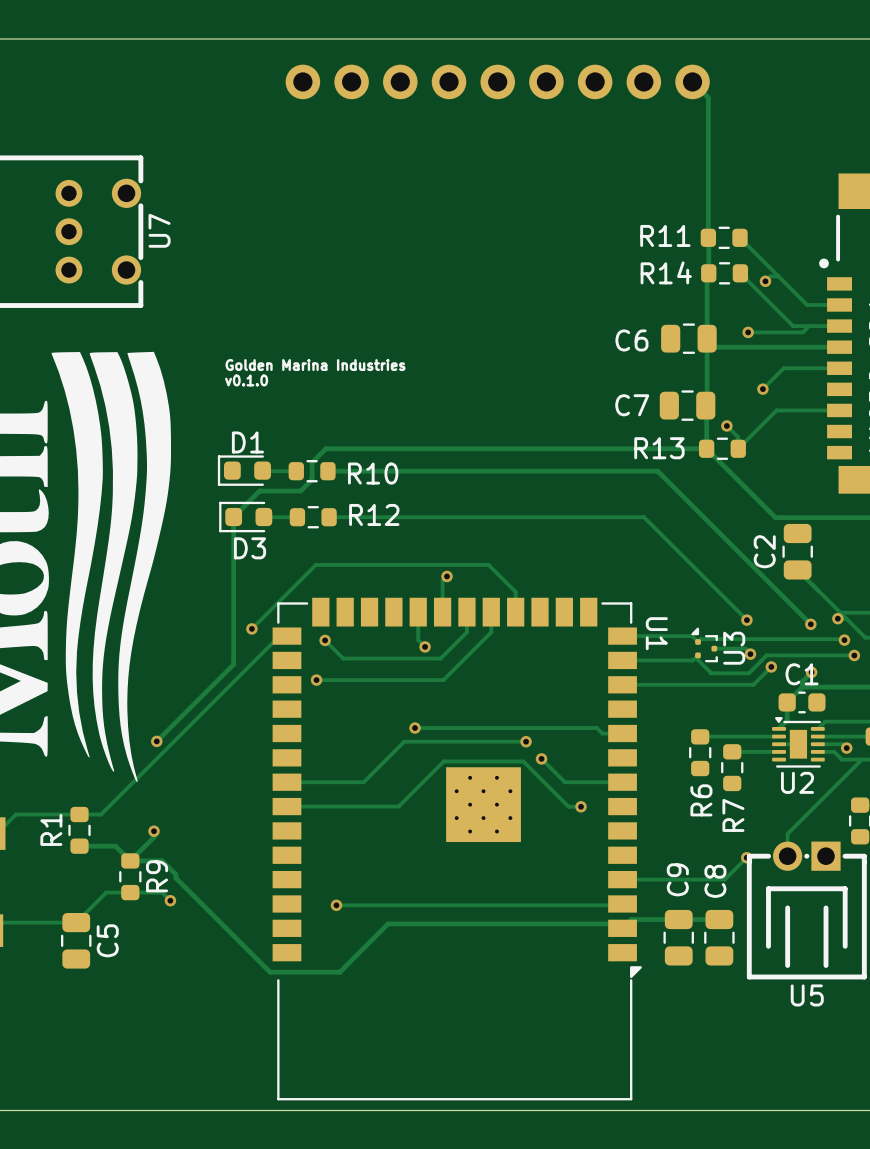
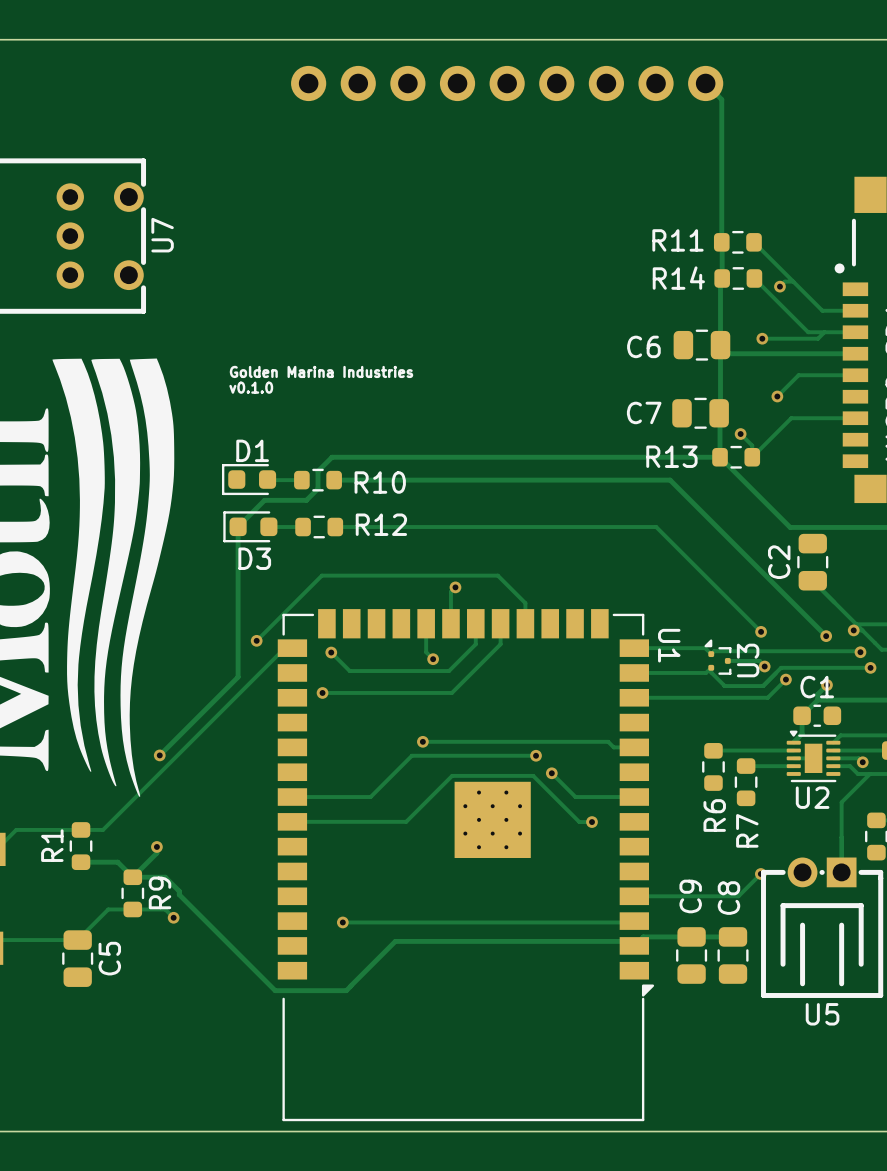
track: none -> (869, 773) (841, 802) (841, 872)
track: (861, 759) (787, 833) (787, 856) -> none

